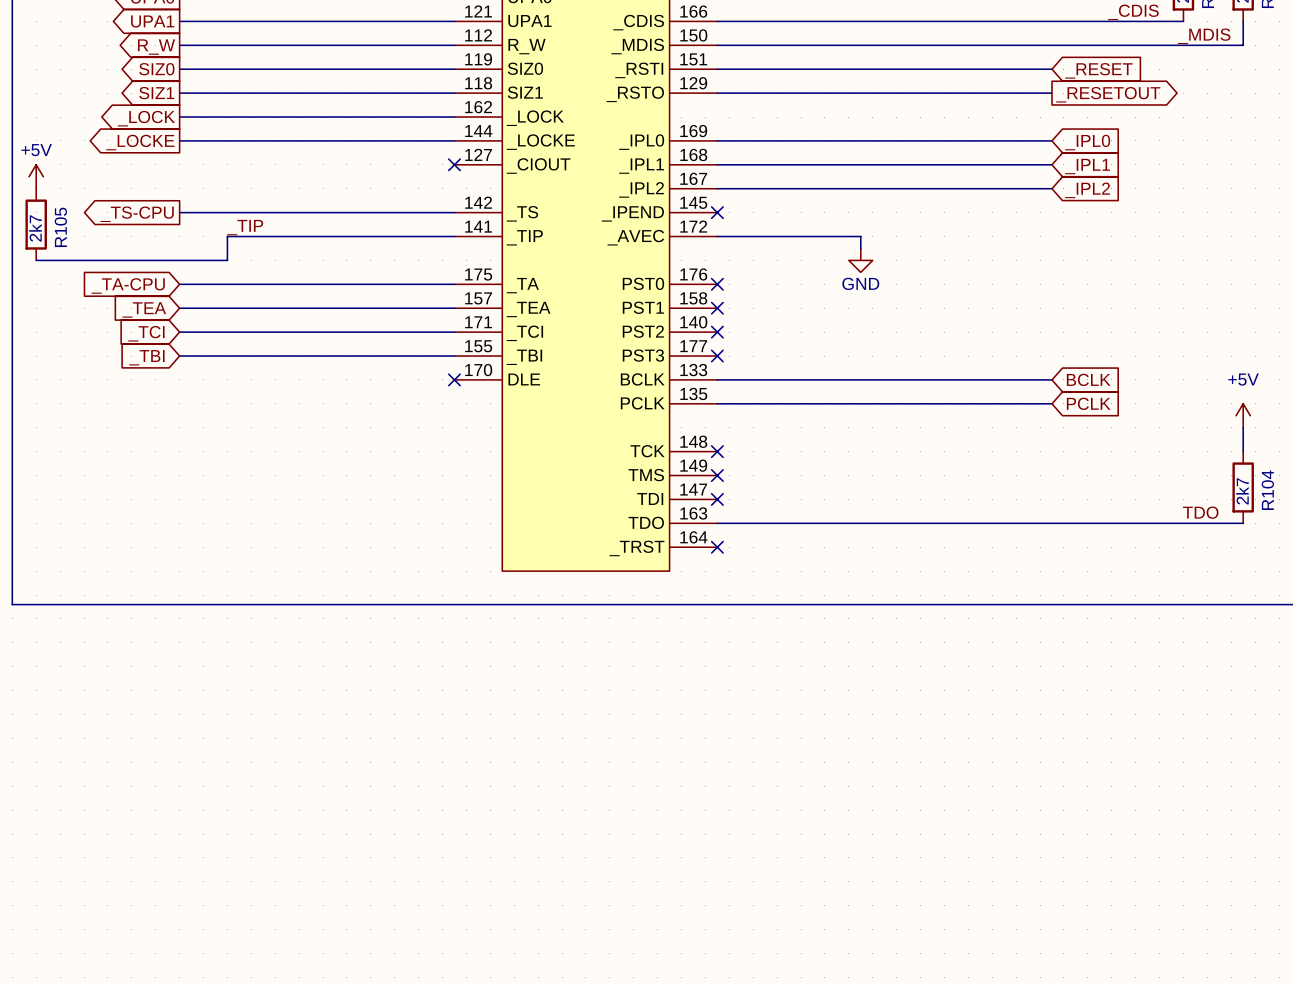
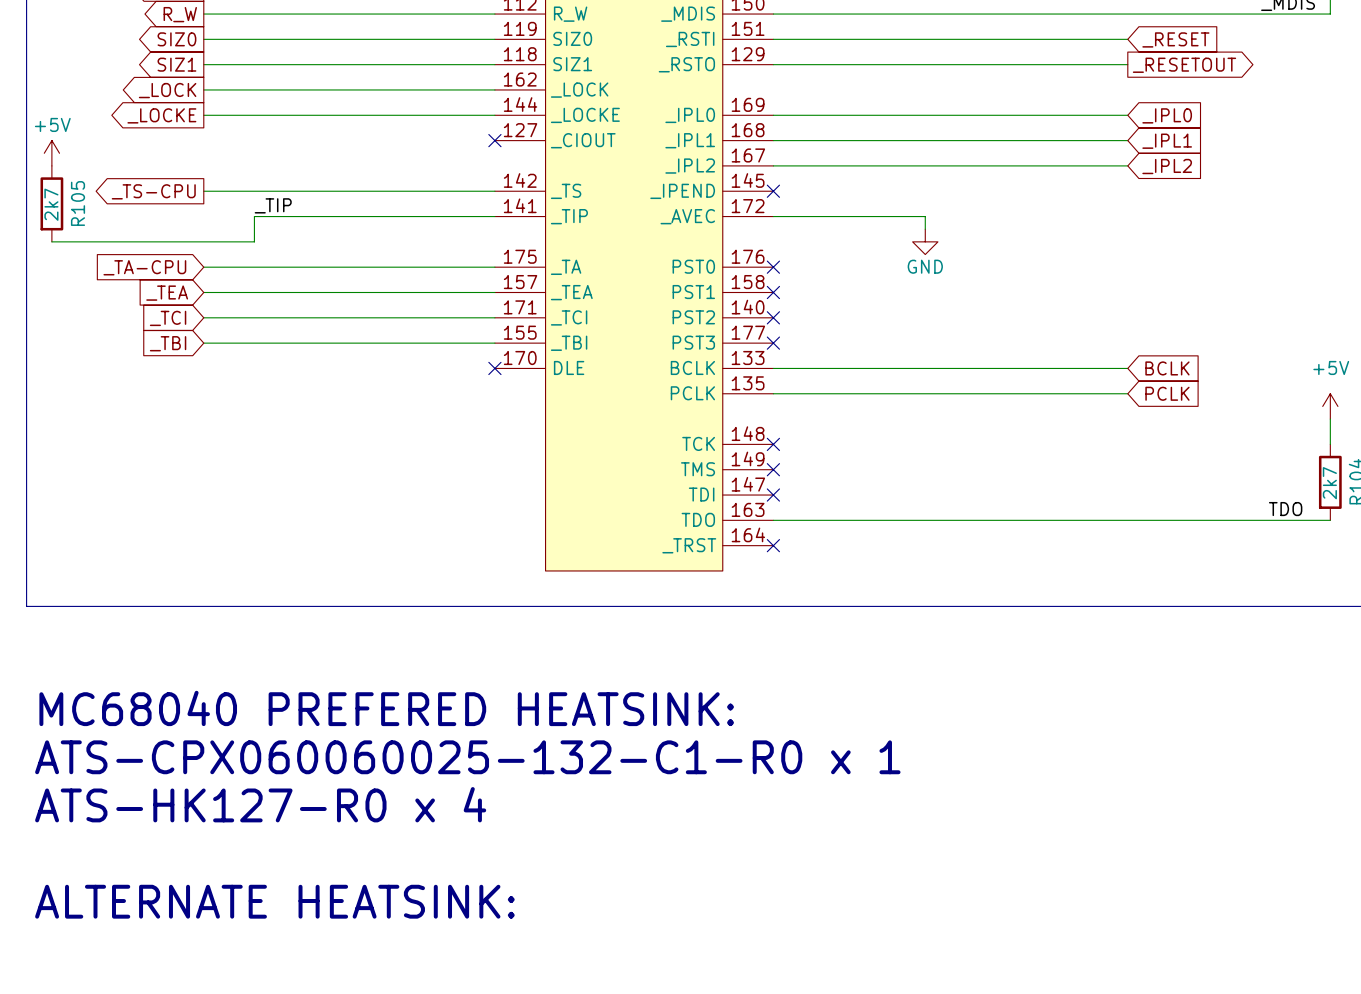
text: none -> MC68040 PREFERED HEATSINK: (386, 708)
text: none -> ATS-CPX060060025-132-C1-R0 x 1 (467, 757)
text: none -> ATS-HK127-R0 x 4 (260, 804)
text: none -> ALTERNATE HEATSINK: (274, 901)

